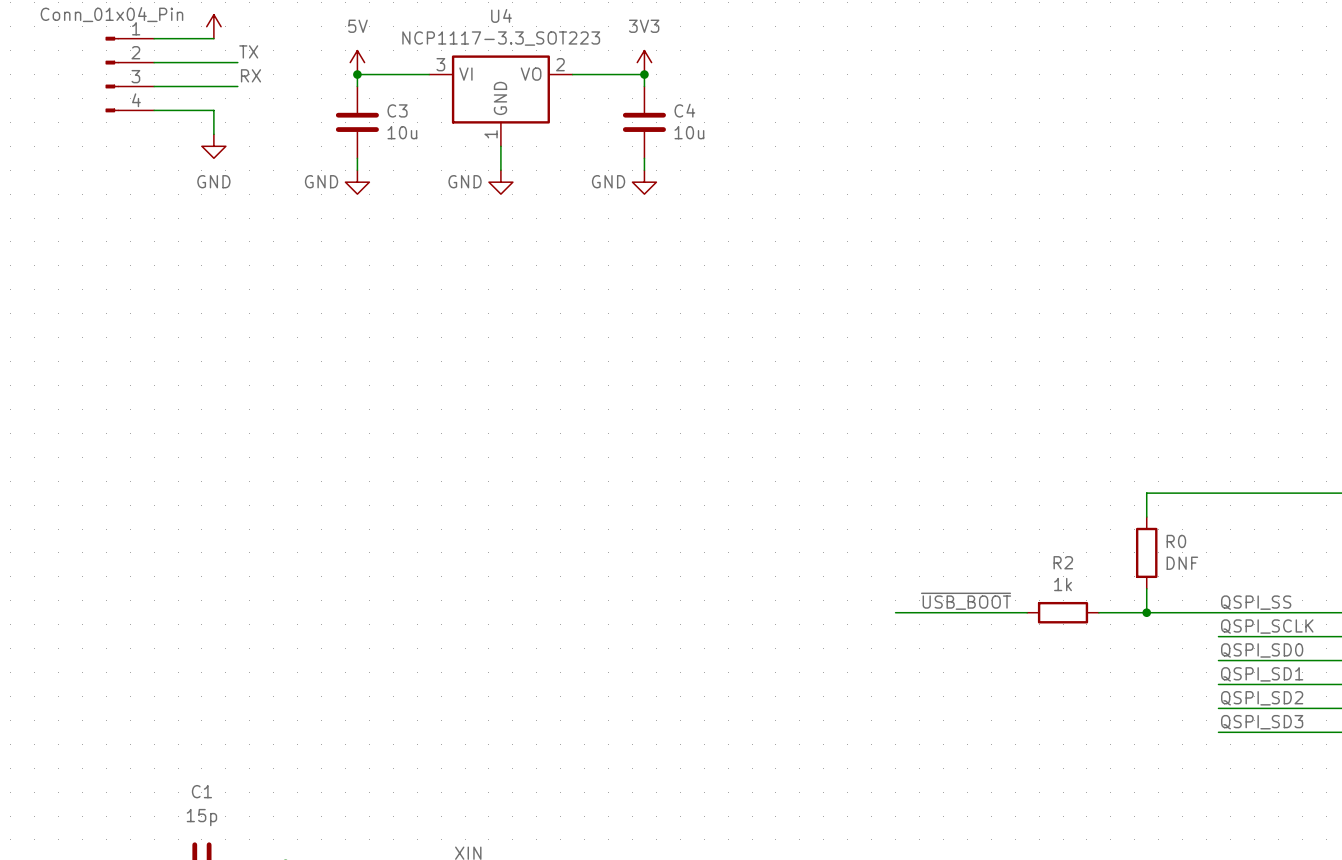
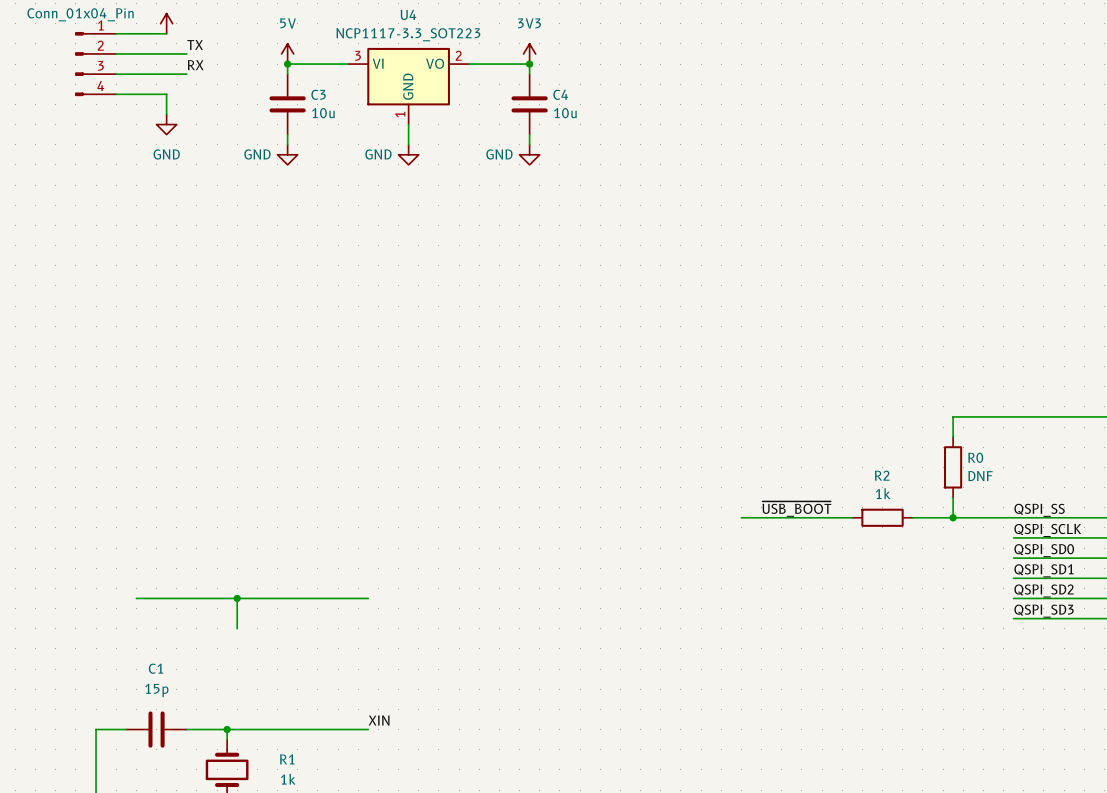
wire: none -> (136, 598) (368, 598)
wire: none -> (237, 598) (237, 628)
junction: none -> (237, 598)

